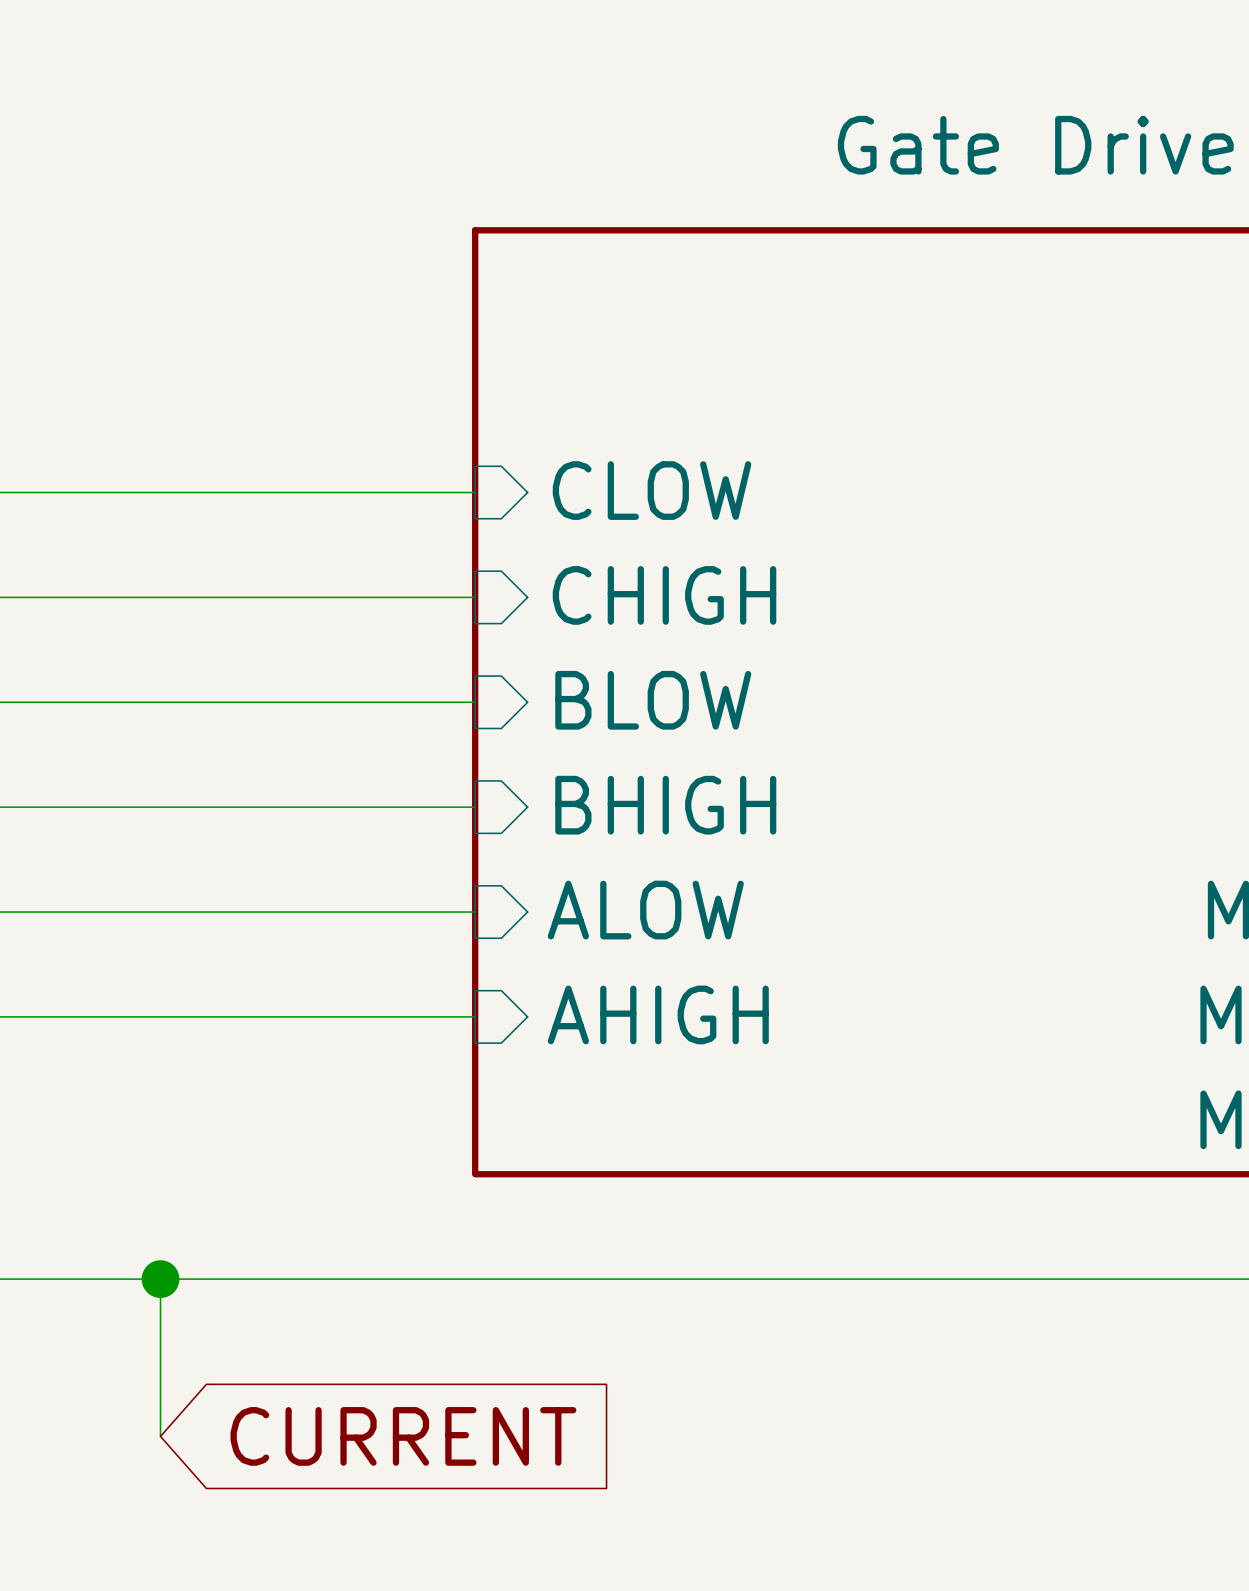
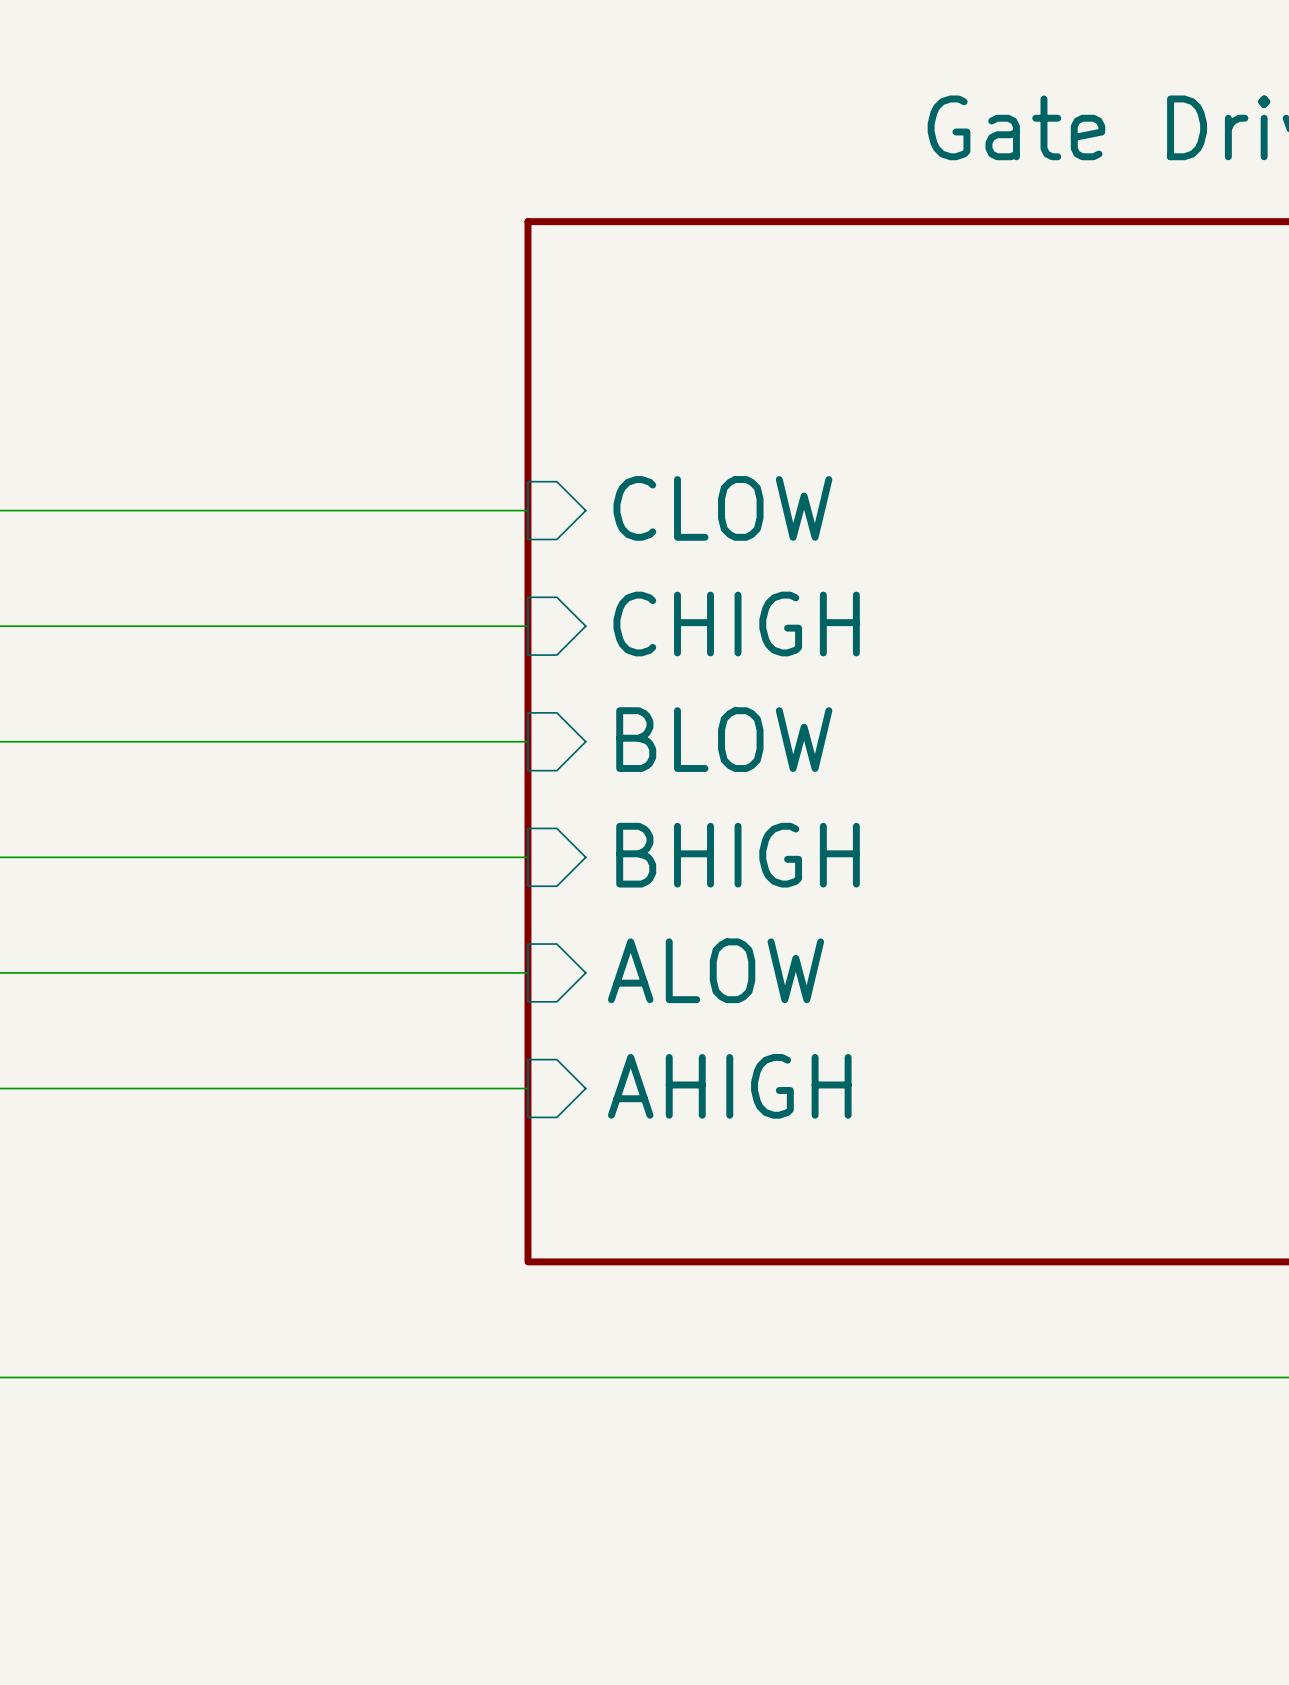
wire: (160, 1279) (160, 1436) -> none
junction: (160, 1279) -> none
global label: CURRENT (403, 1436) -> none

